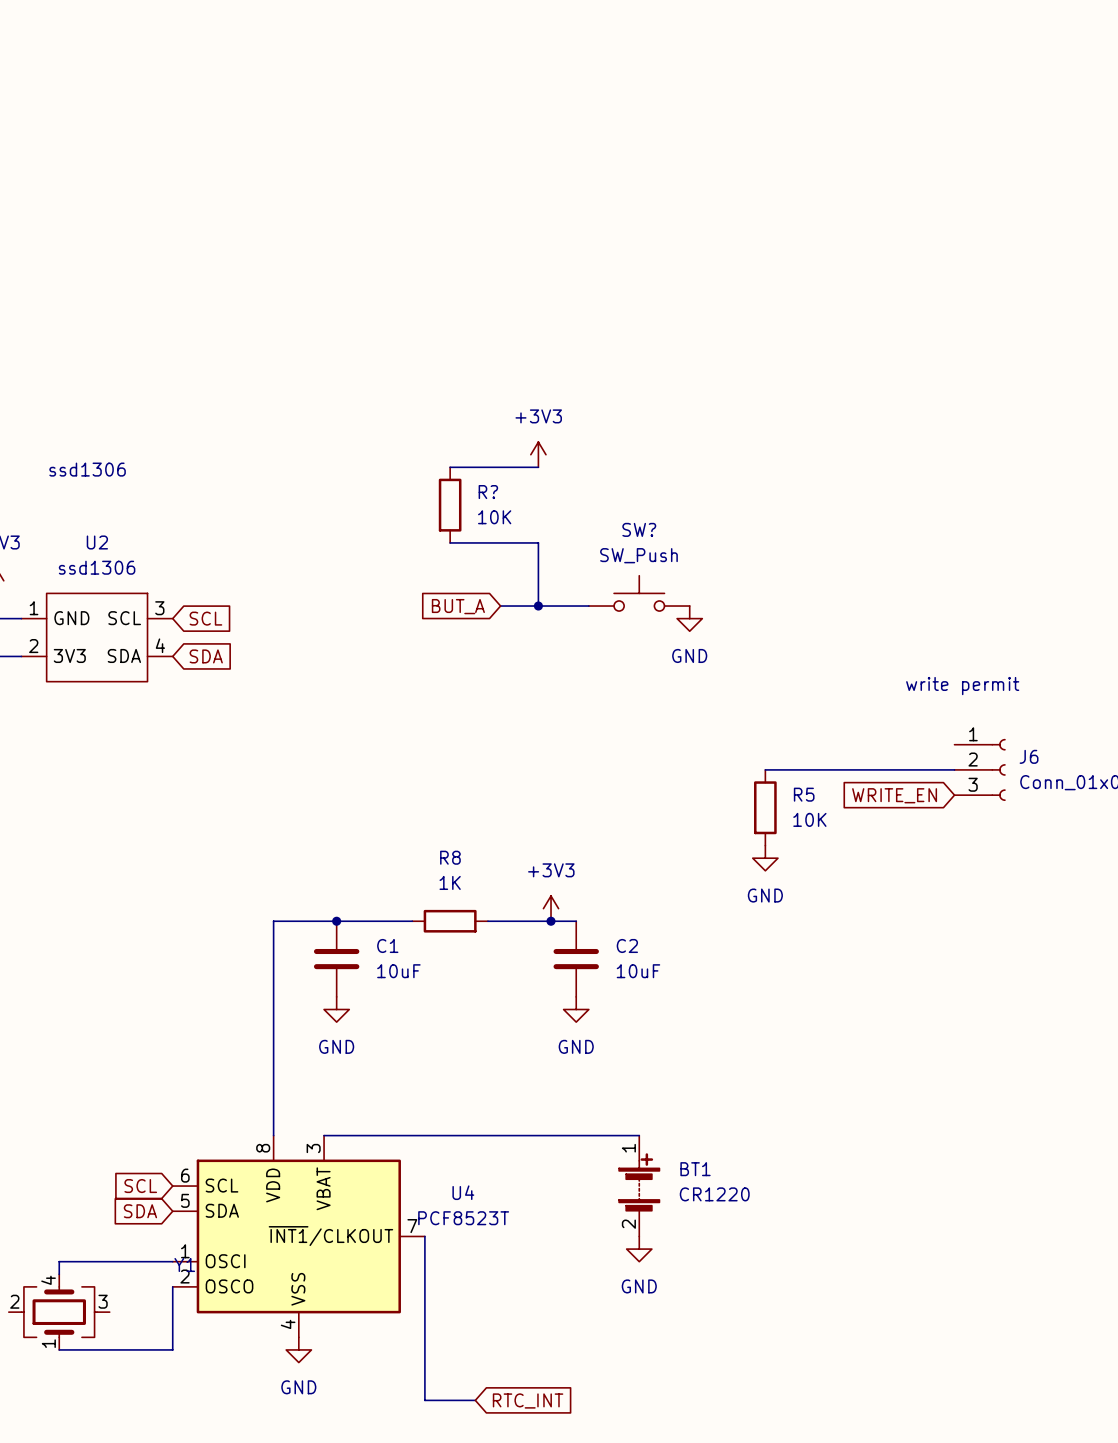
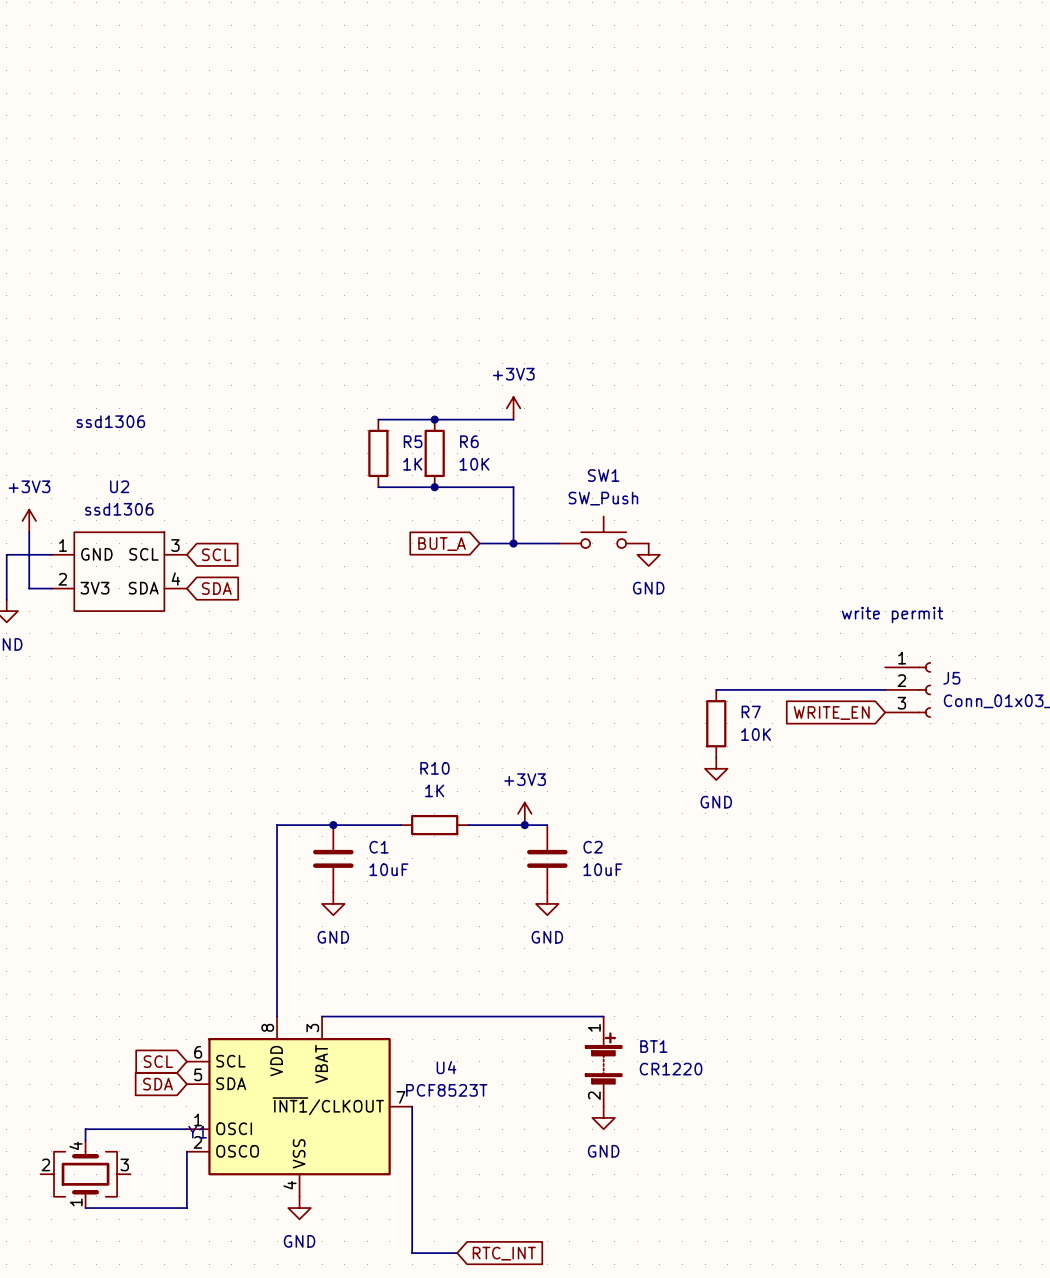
wire: none -> (378, 419) (434, 419)
junction: none -> (434, 419)
R? name: R? (488, 492) -> R6 (469, 441)
R5: none -> 1K (378, 453)
SW? name: SW? (639, 529) -> SW1 (603, 475)
wire: none -> (378, 487) (434, 487)
junction: none -> (434, 487)
J6 name: J6 (1029, 756) -> J5 (951, 678)
R5 name: R5 (804, 794) -> R7 (751, 712)
R8 name: R8 (450, 857) -> R10 (434, 768)

